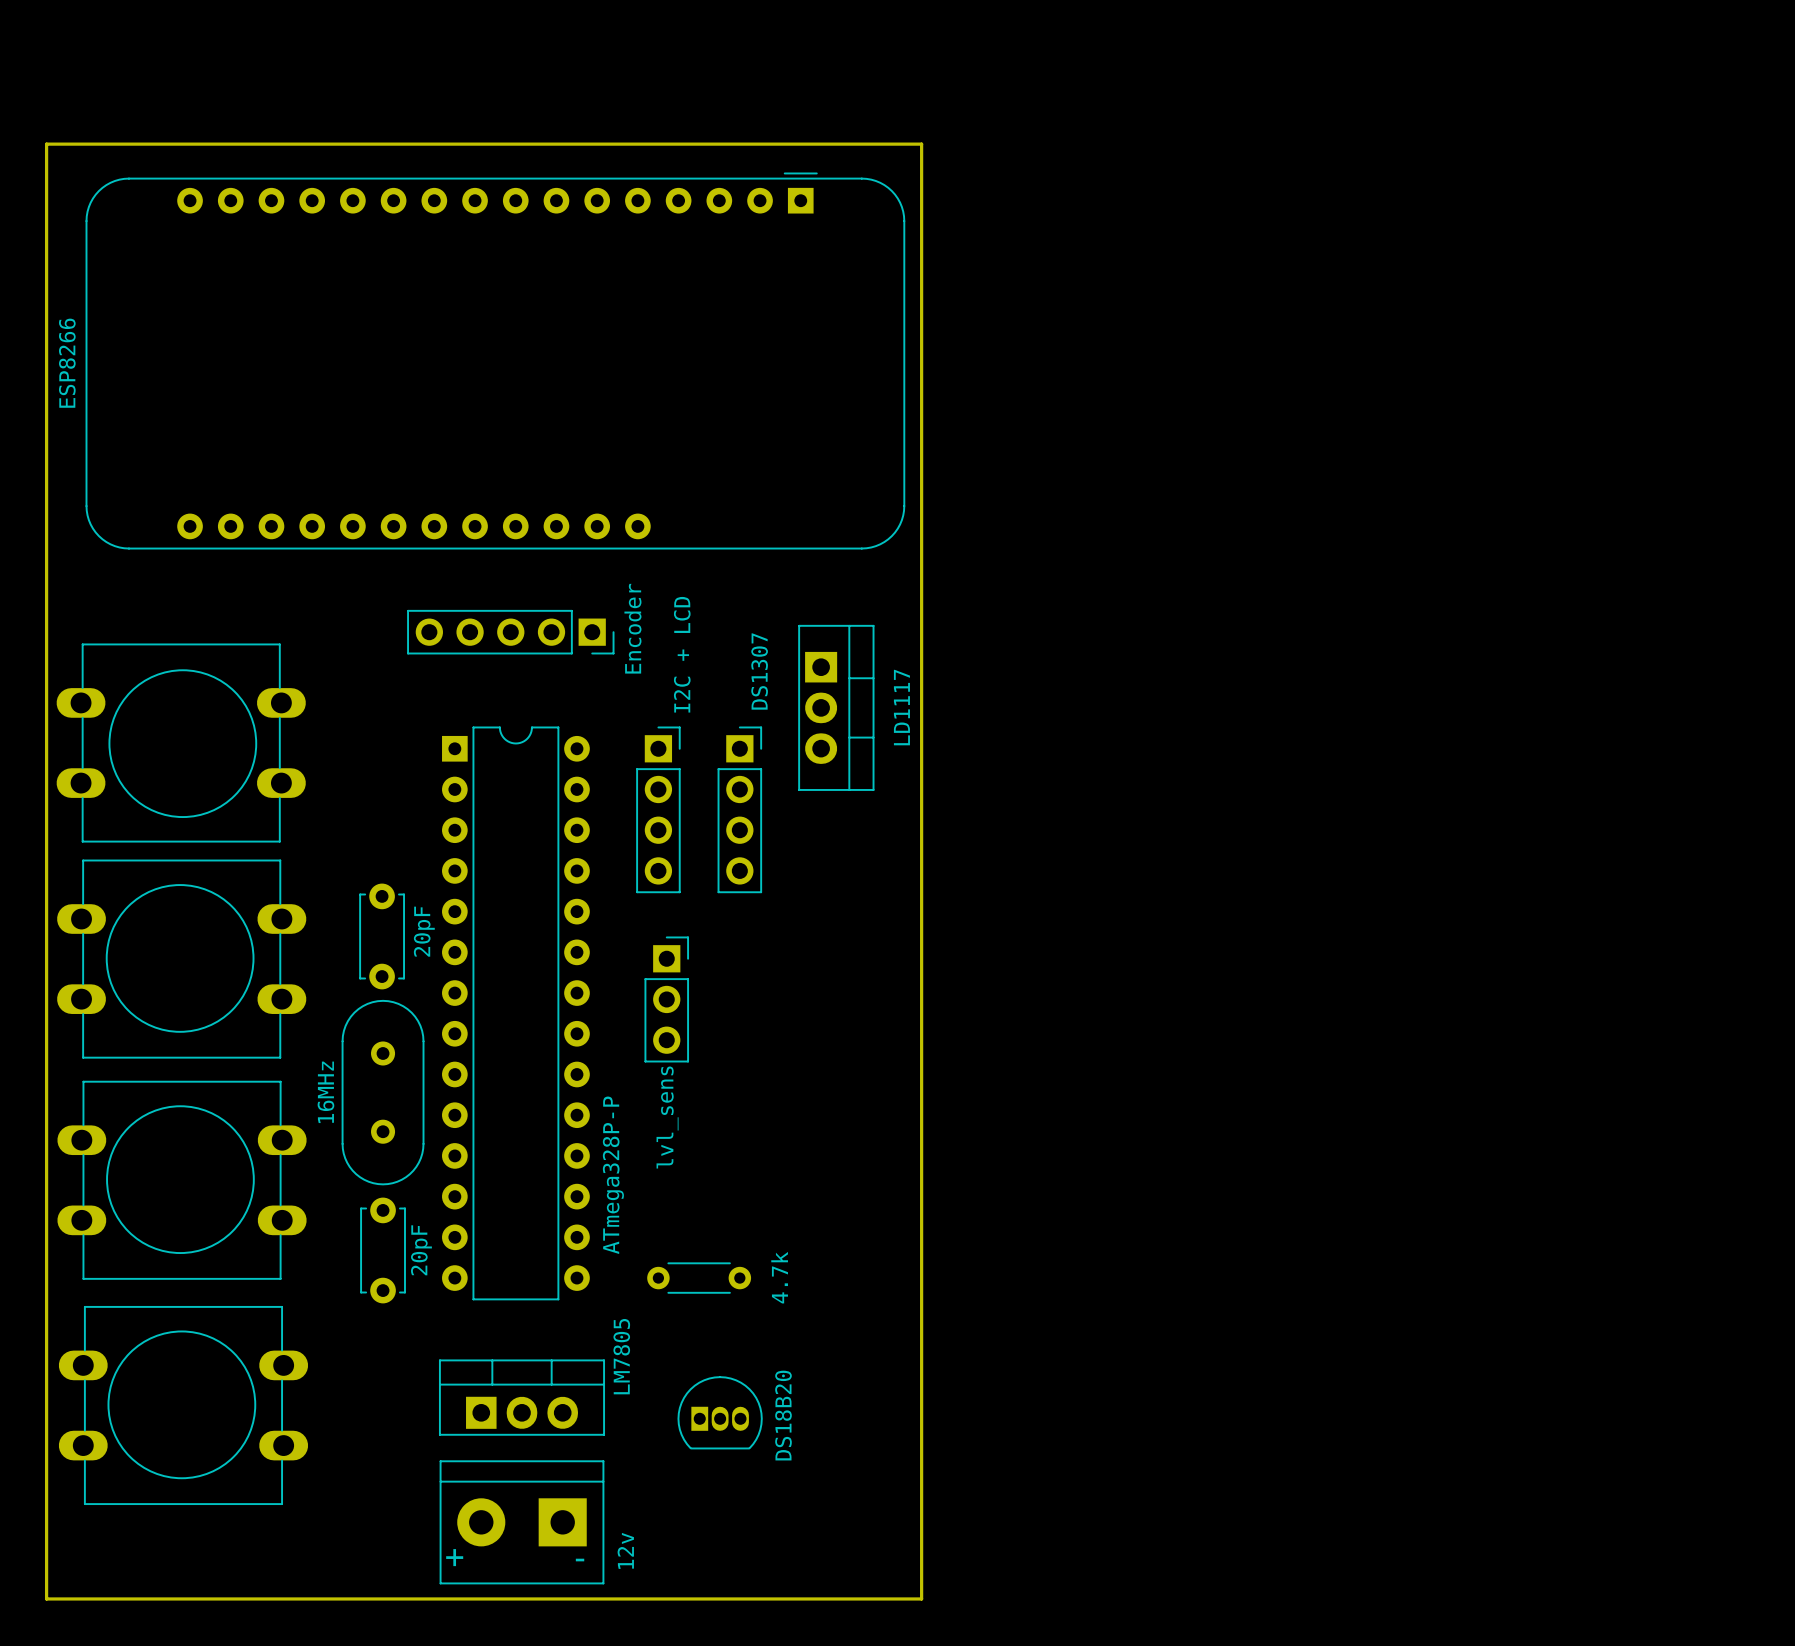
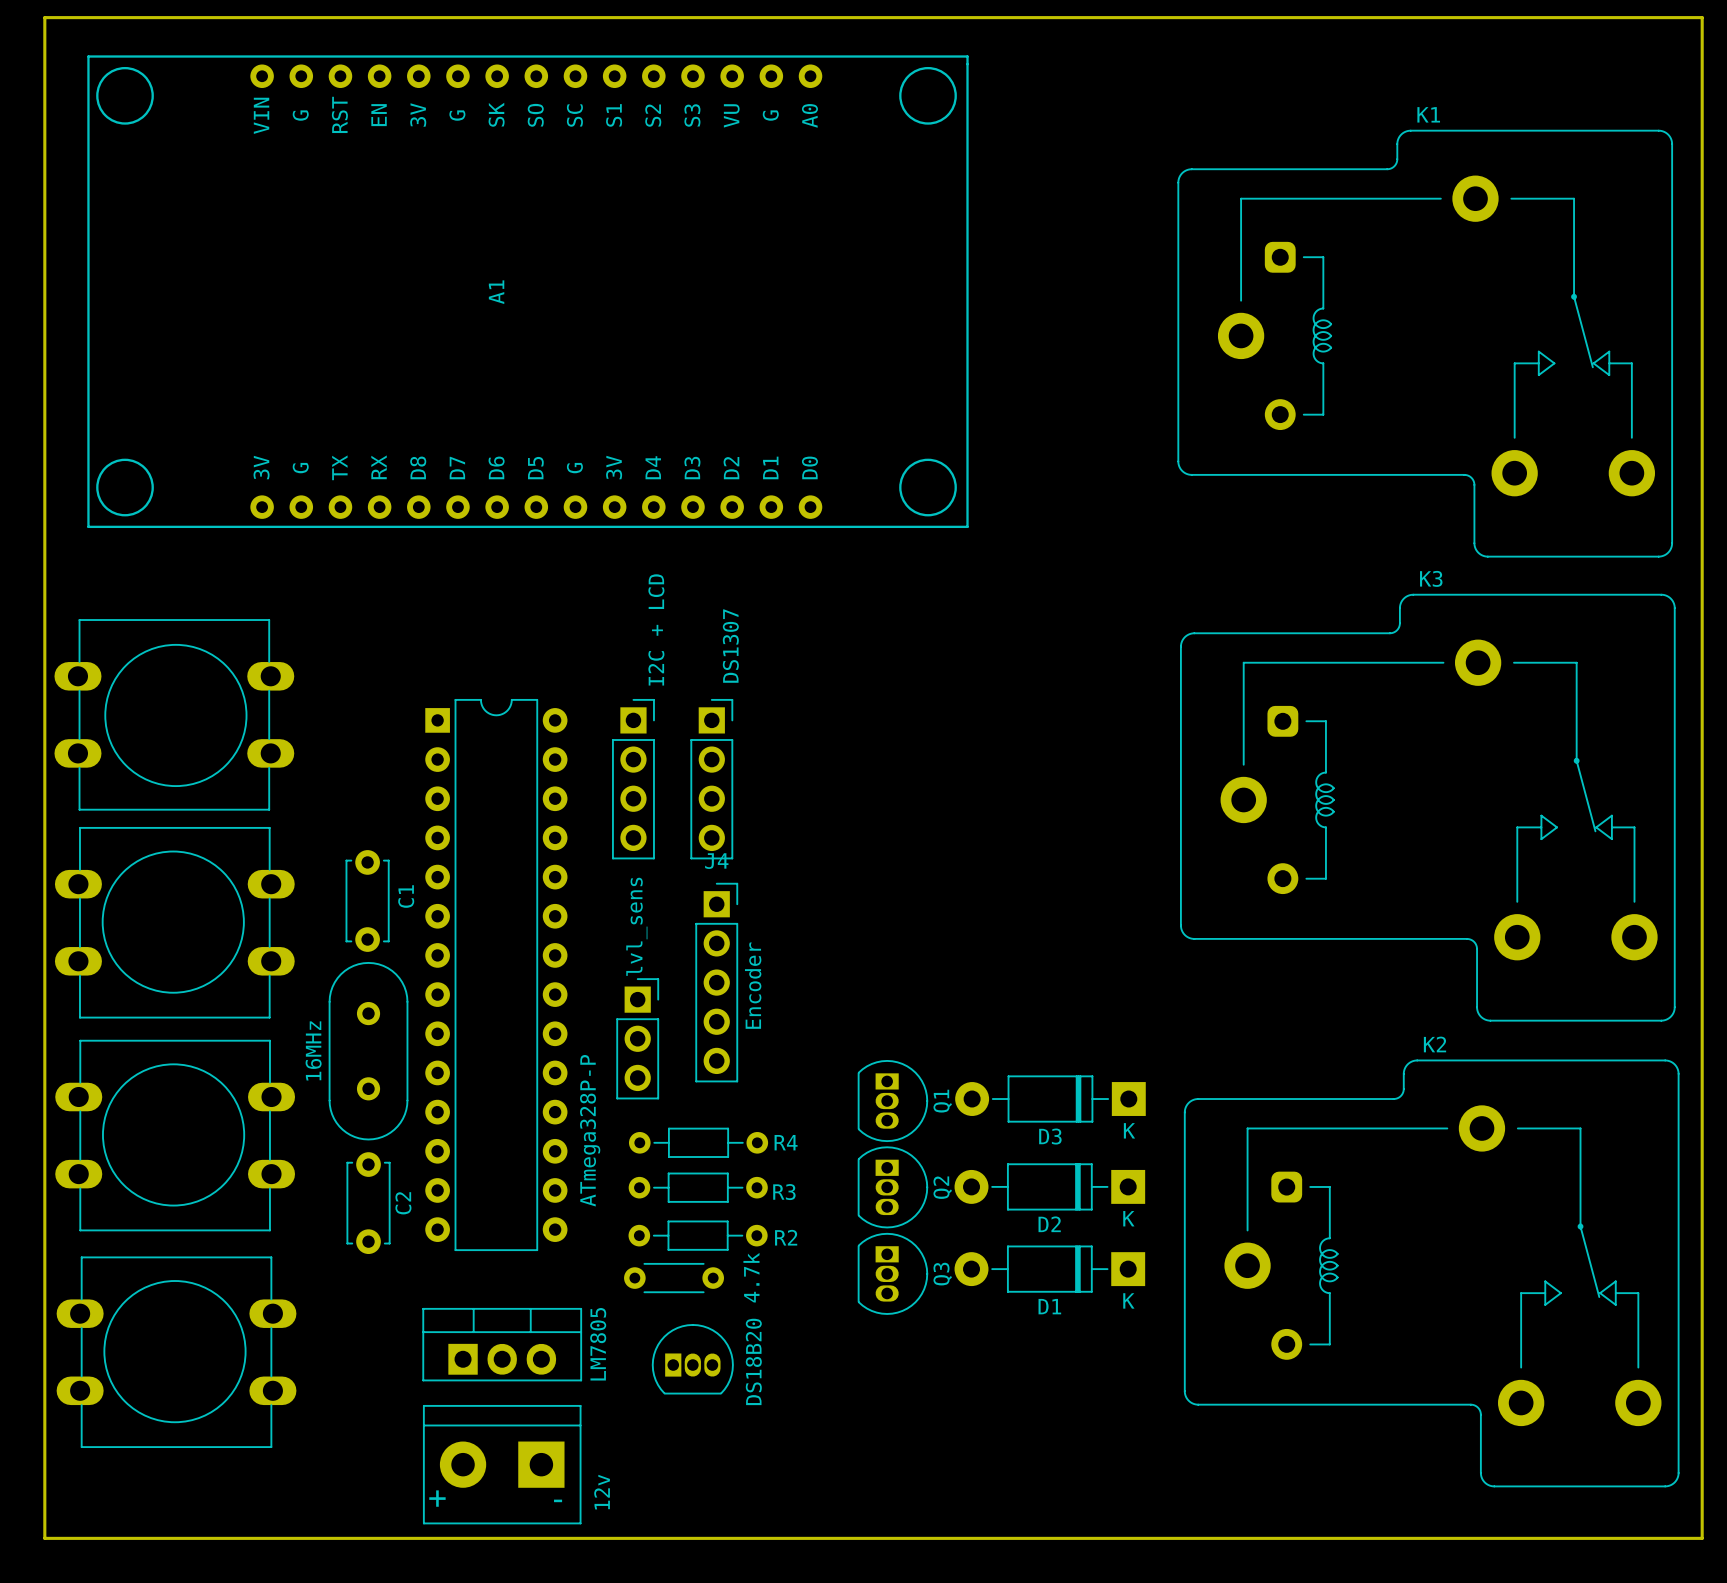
board edge: (46, 144) (921, 144) (921, 1598) -> (44, 138) (44, 17) (1702, 17) (1702, 1538) (886, 1538)
A1: none -> (527, 291)
K1: none -> (1425, 343)
part: ESP8266 (495, 360) -> none
part: Encoder (510, 632) -> none
part: LD1117 (836, 707) -> none
K3: none -> (1427, 807)
20pF name: 20pF (424, 931) -> C1 (406, 896)
part position: (666, 999) -> (637, 1038)
J4: none -> Encoder (716, 982)
part value position: lvl_sens (667, 1117) -> lvl_sens (636, 926)
D3: none -> (1050, 1099)
Q1: none -> (892, 1101)
R4: none -> (698, 1142)
D2: none -> (1049, 1186)
R3: none -> (698, 1187)
Q2: none -> (892, 1187)
20pF name: 20pF (421, 1250) -> C2 (403, 1203)
part position: (699, 1278) -> (674, 1278)
R2: none -> (698, 1235)
D1: none -> (1049, 1269)
K2: none -> (1431, 1273)
Q3: none -> (892, 1273)
part value position: LM7805 (621, 1356) -> LM7805 (598, 1344)

